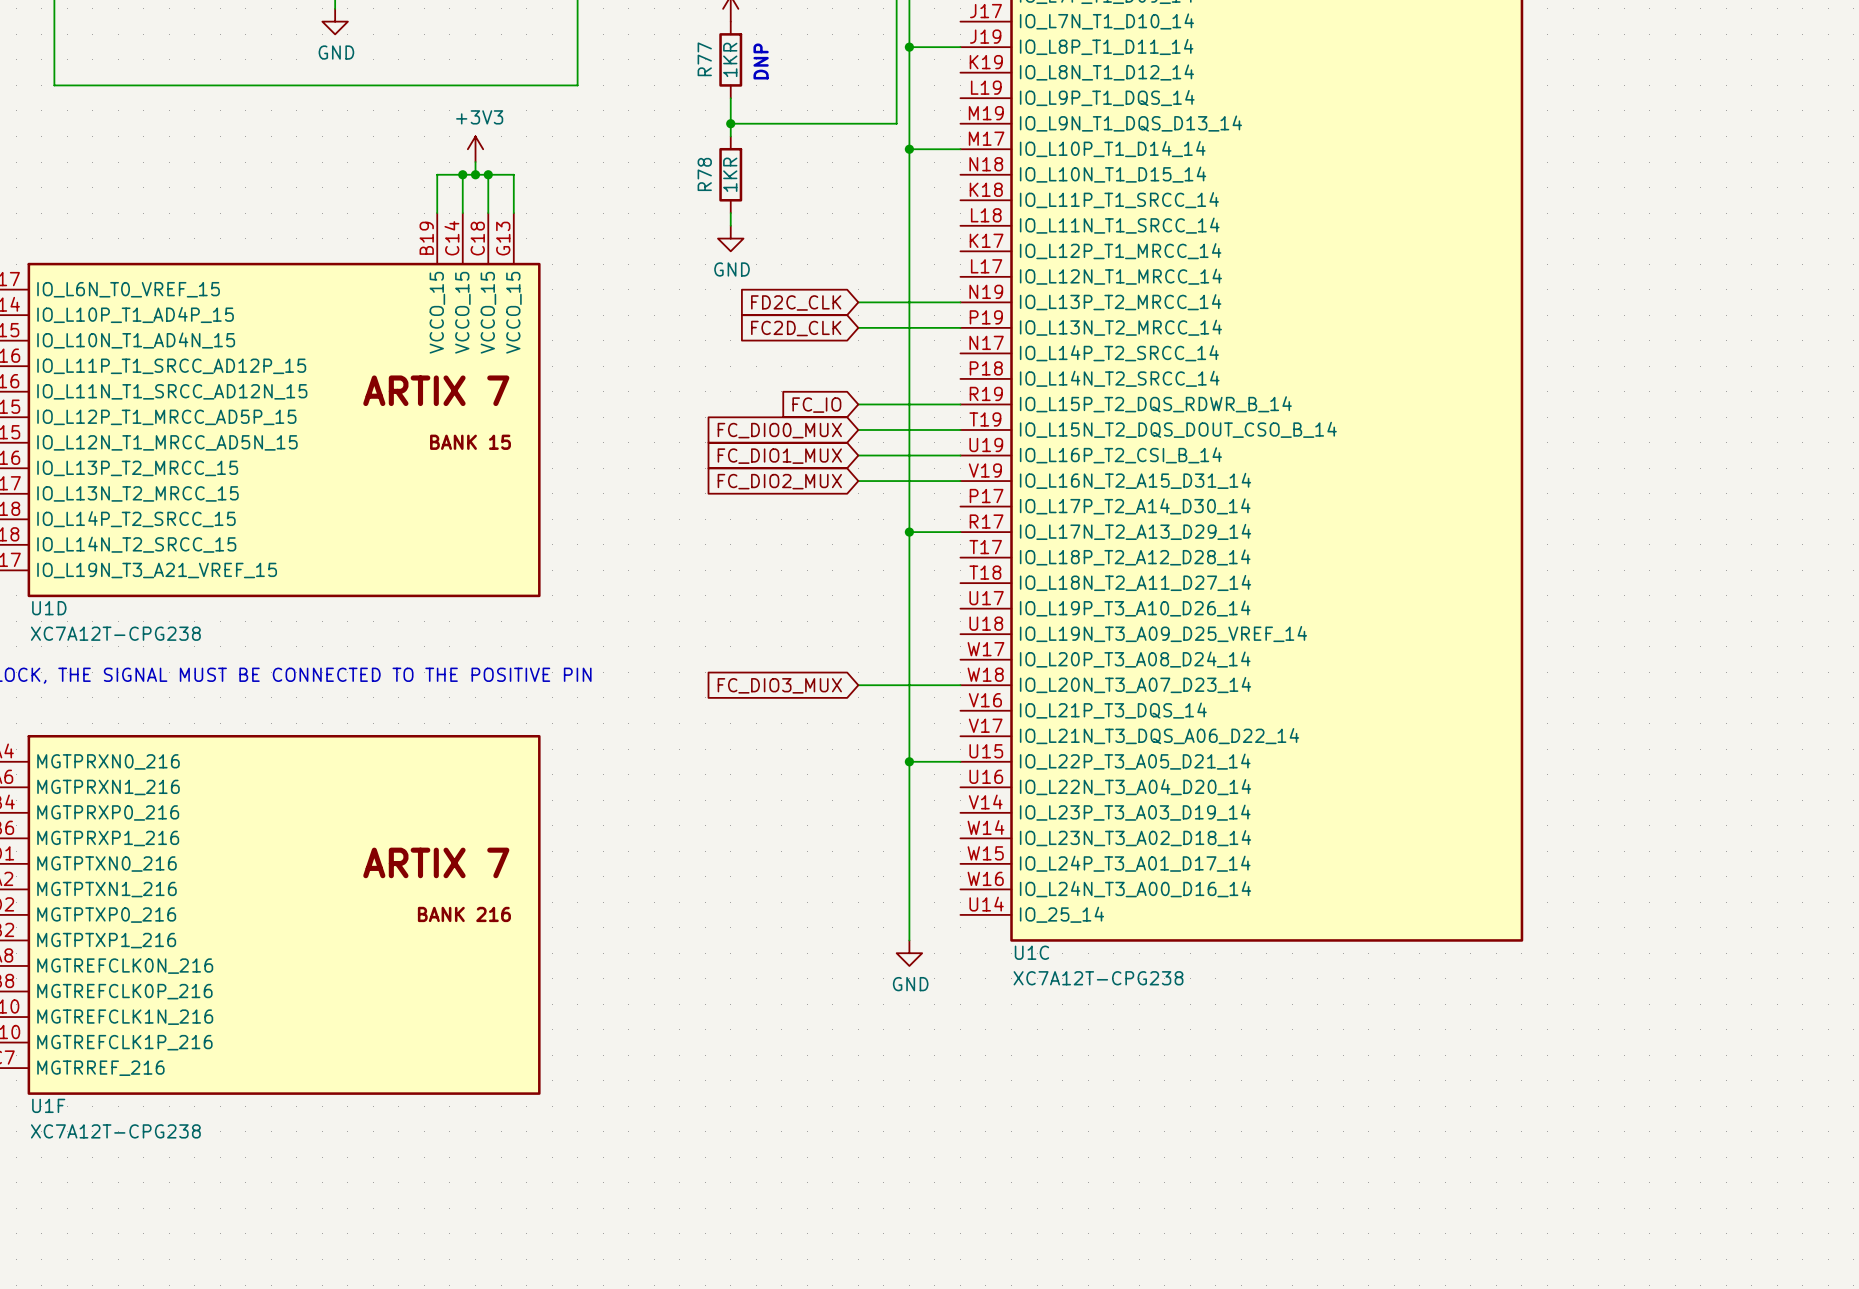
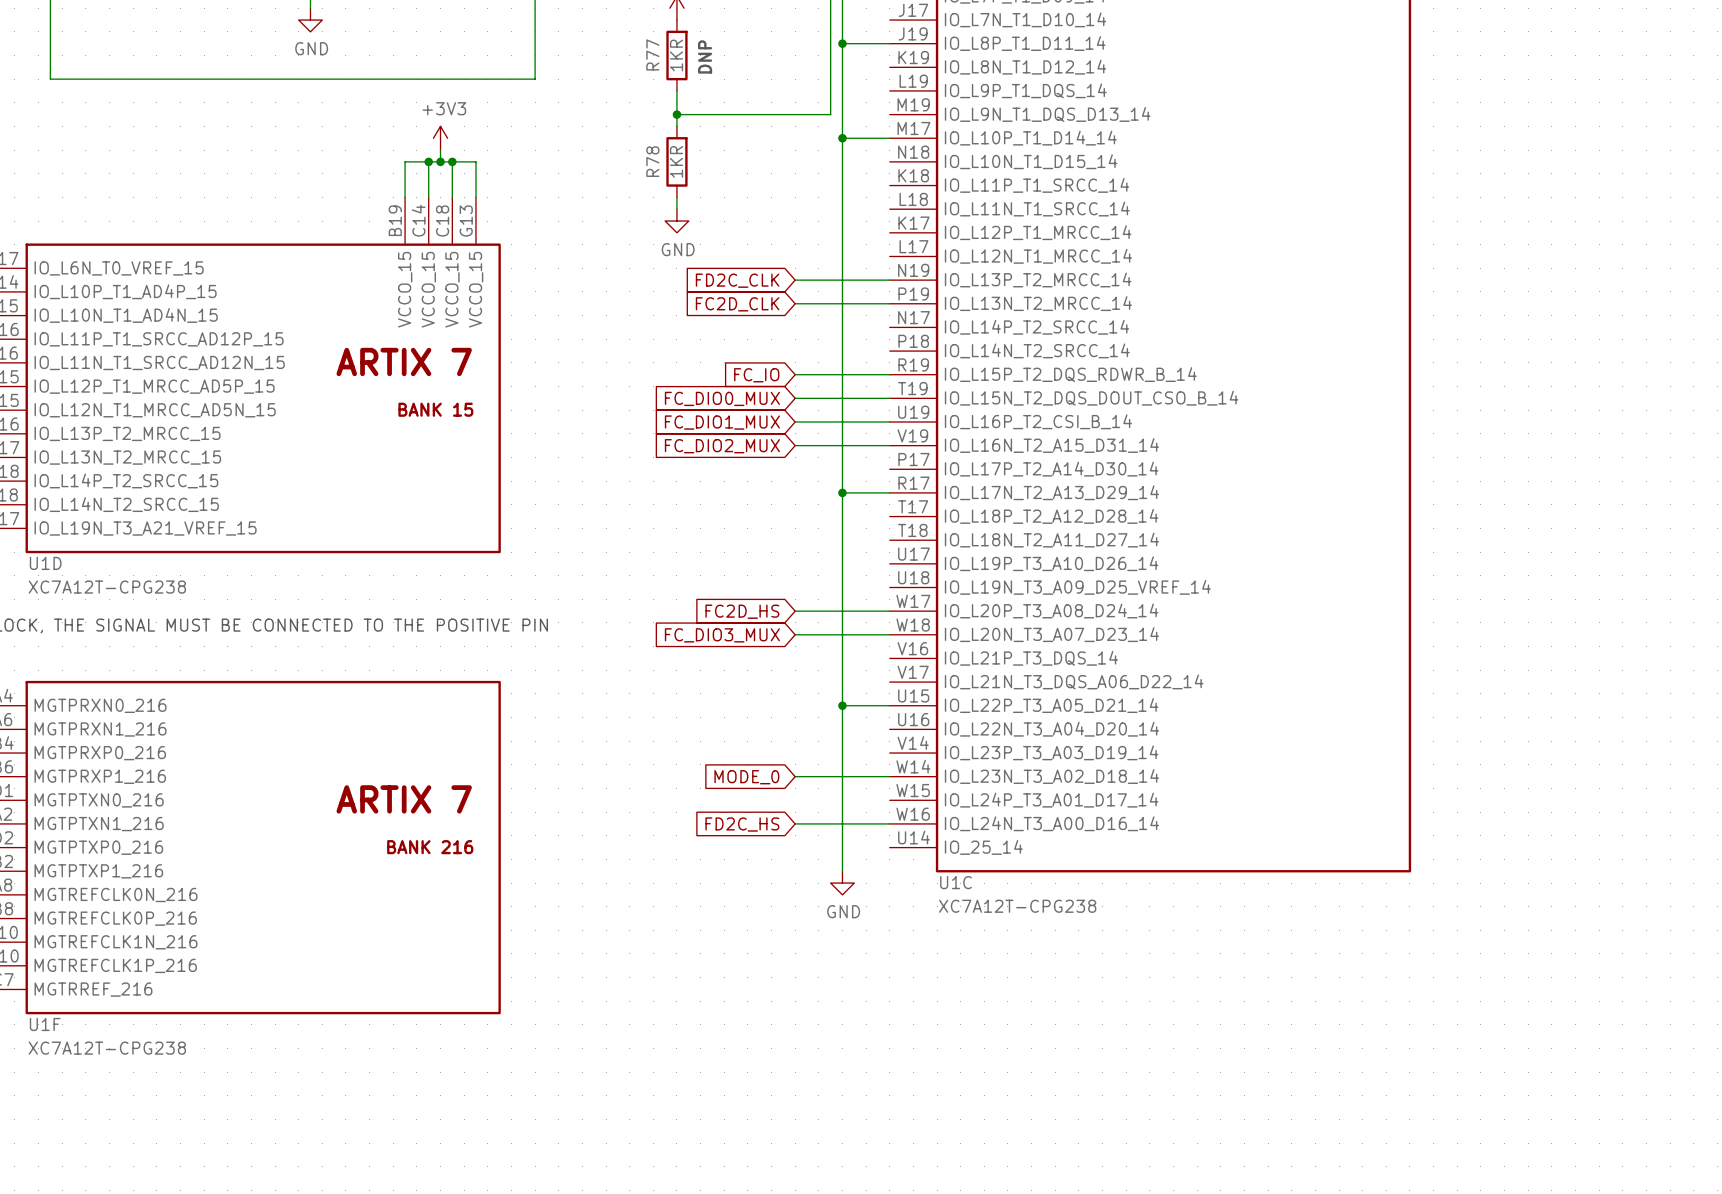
wire: none -> (795, 611) (889, 611)
global label: none -> FC2D_HS (742, 611)
global label: none -> MODE_0 (746, 777)
wire: none -> (795, 776) (889, 776)
wire: none -> (795, 823) (889, 823)
global label: none -> FD2C_HS (742, 824)

